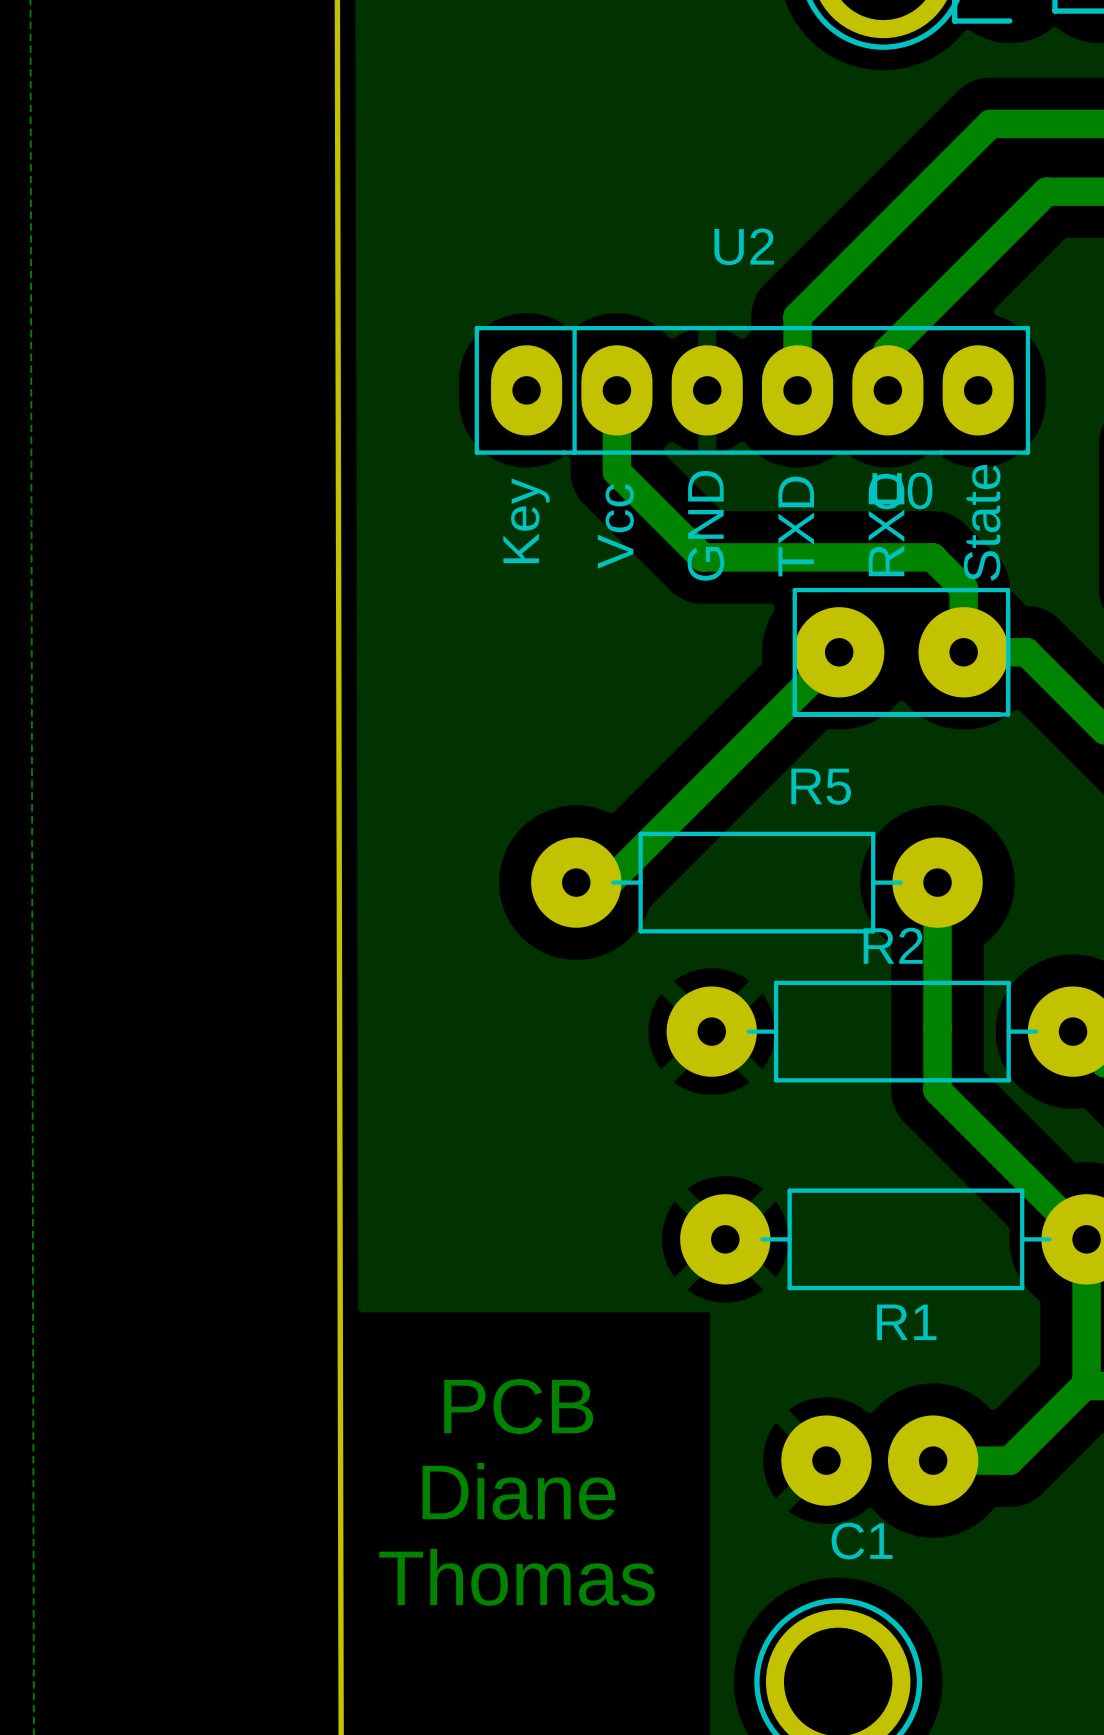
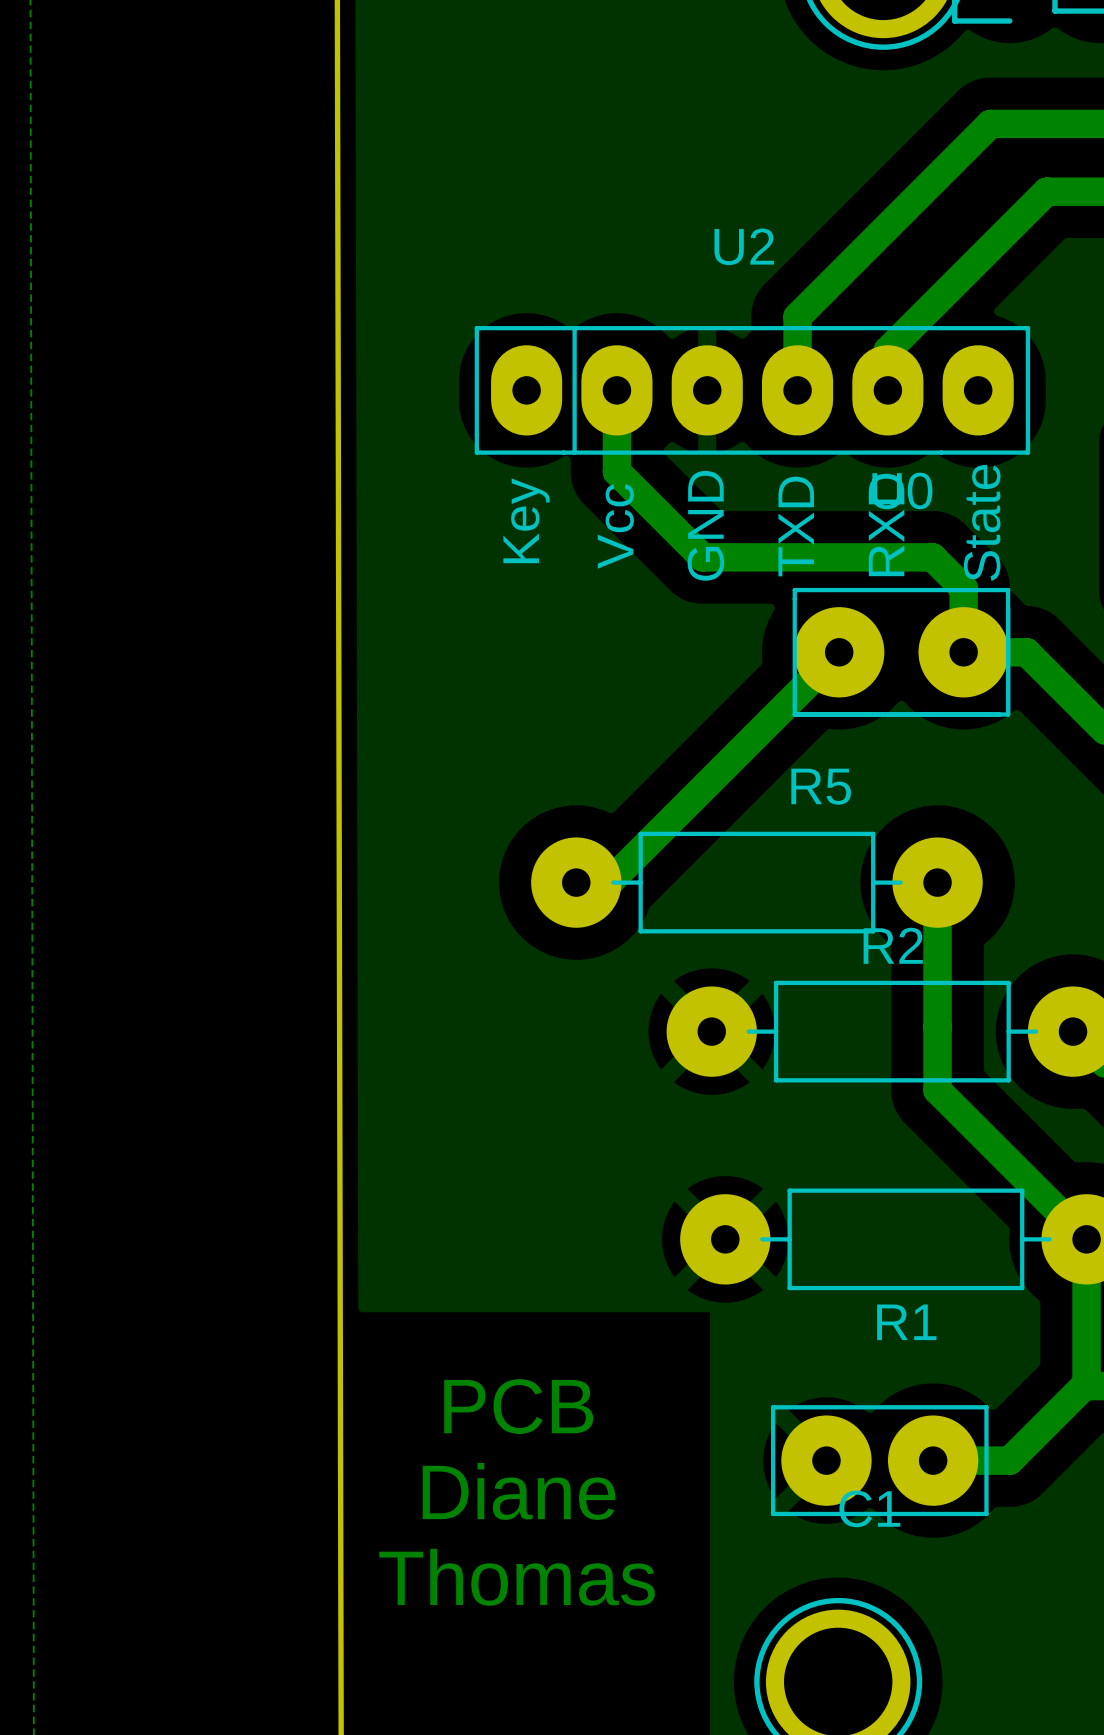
C1 footprint: [781, 1415, 979, 1506] -> [771, 1405, 989, 1517]

